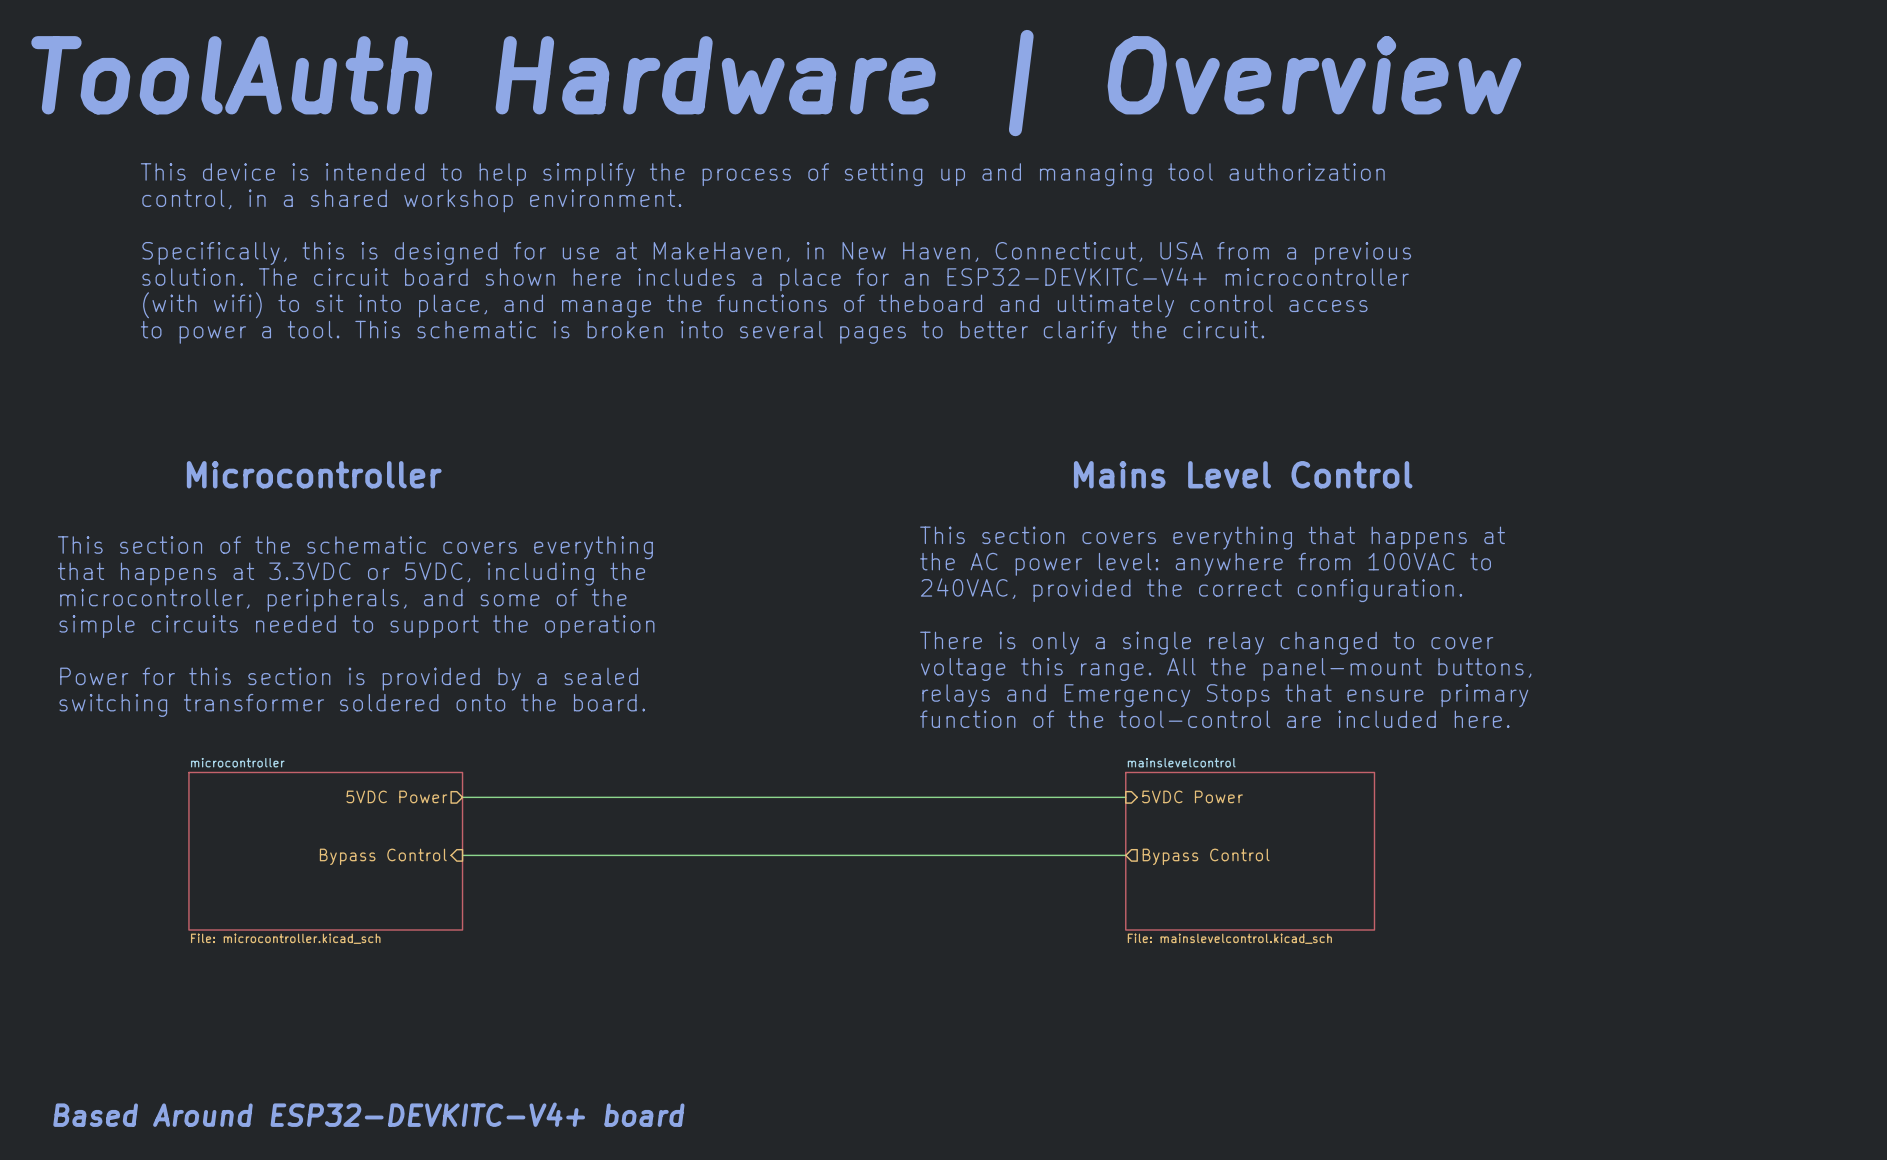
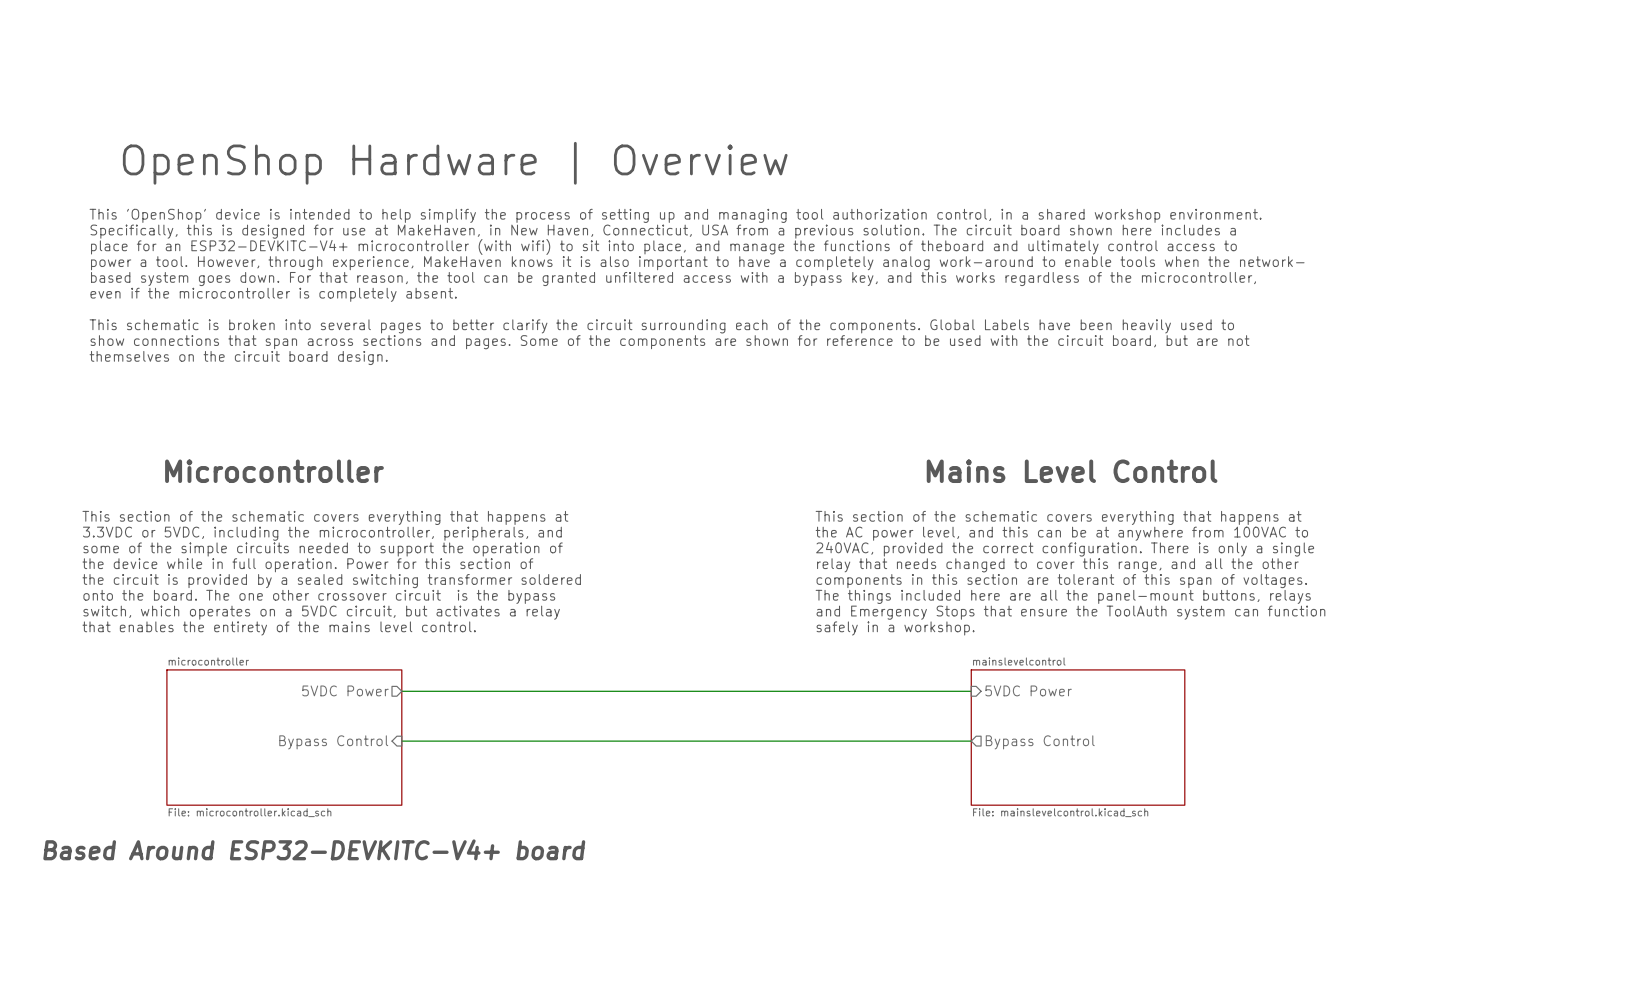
text: ToolAuth Hardware | Overview (776, 83) -> OpenShop Hardware | Overview (455, 163)
text: This device is intended to help simplify the process of setting up and managing tool authorization (762, 174) -> none
text: control, in a shared workshop environment. (411, 200) -> none
text: none -> This 'OpenShop' device is intended to help simplify the process of setting up and managing tool authorization control, in a shared workshop environment. (675, 215)
text: Specifically, this is designed for use at MakeHaven, in New Haven, Connecticut, USA from a previous (776, 253) -> Specifically, this is designed for use at MakeHaven, in New Haven, Connecticut, USA from a previous solution. The circuit board shown here includes a (663, 231)
text: solution. The circuit board shown here includes a place for an ESP32-DEVKITC-V4+ microcontroller (775, 279) -> none
text: none -> power a tool. However, through experience, MakeHaven knows it is also important to have a completely analog work-around to enable tools when the network- (697, 263)
text: (with wifi) to sit into place, and manage the functions of theboard and ultimately control access (755, 305) -> place for an ESP32-DEVKITC-V4+ microcontroller (with wifi) to sit into place, and manage the functions of theboard and ultimately control access to (663, 246)
text: none -> based system goes down. For that reason, the tool can be granted unfiltered access with a bypass key, and this works regardless of the microcontroller, (673, 279)
text: to power a tool. This schematic is broken into several pages to better clarify the circuit. (702, 332) -> none
text: none -> even if the microcontroller is completely absent. (273, 294)
text: none -> This schematic is broken into several pages to better clarify the circuit surrounding each of the components. Global Labels have been heavily used to (661, 326)
text: none -> show connections that span across sections and pages. Some of the components are shown for reference to be used with the circuit board, but are not (669, 342)
text: none -> themselves on the circuit board design. (238, 357)
text position: Microcontroller (314, 474) -> Microcontroller (274, 471)
text position: Mains Level Control (1243, 474) -> Mains Level Control (1072, 471)
text: This section covers everything that happens at (1212, 538) -> none
text: This section of the schematic covers everything (355, 547) -> none
text: the AC power level: anywhere from 100VAC to (1205, 564) -> none
text: that happens at 3.3VDC or 5VDC, including the (351, 574) -> none
text: 240VAC, provided the correct configuration. (1191, 590) -> none
text: none -> This section of the schematic covers everything that happens at (325, 517)
text: none -> This section of the schematic covers everything that happens at (1058, 517)
text: microcontroller, peripherals, and some of the (343, 600) -> 3.3VDC or 5VDC, including the microcontroller, peripherals, and (322, 533)
text: none -> the AC power level, and this can be at anywhere from 100VAC to (1061, 533)
text: simple circuits needed to support the operation (356, 626) -> some of the simple circuits needed to support the operation of (323, 549)
text: none -> 240VAC, provided the correct configuration. There is only a single (1065, 549)
text: There is only a single relay changed to cover (1206, 643) -> none
text: none -> the device while in full operation. Power for this section of (307, 565)
text: none -> relay that needs changed to cover this range, and all the other (1057, 565)
text: none -> the circuit is provided by a sealed switching transformer soldered (331, 581)
text: voltage this range. All the panel-mount buttons, (1226, 669) -> The things included here are all the panel-mount buttons, relays (1063, 596)
text: none -> components in this section are tolerant of this span of voltages. (1061, 581)
text: Power for this section is provided by a sealed (349, 679) -> none
text: none -> onto the board. The one other crossover circuit is the bypass (319, 596)
text: relays and Emergency Stops that ensure primary (1225, 695) -> none
text: switching transformer soldered onto the board. (352, 705) -> none
text: none -> switch, which operates on a 5VDC circuit, but activates a relay (321, 612)
text: none -> and Emergency Stops that ensure the ToolAuth system can function (1070, 612)
text: function of the tool-control are included here. (1214, 719) -> none
text: none -> that enables the entirety of the mains level control. (279, 628)
text: none -> safely in a workshop. (895, 628)
text position: Based Around ESP32-DEVKITC-V4+ board (368, 1114) -> Based Around ESP32-DEVKITC-V4+ board (314, 849)

